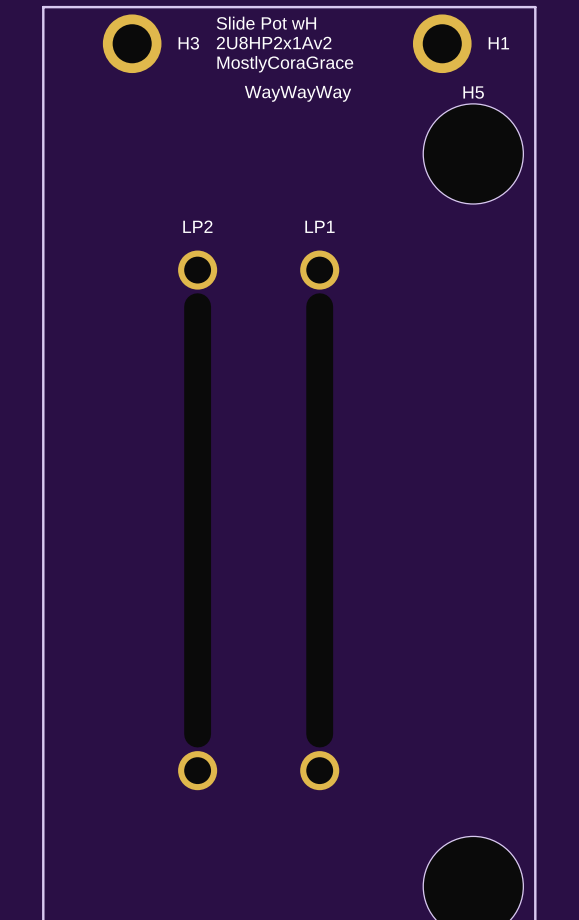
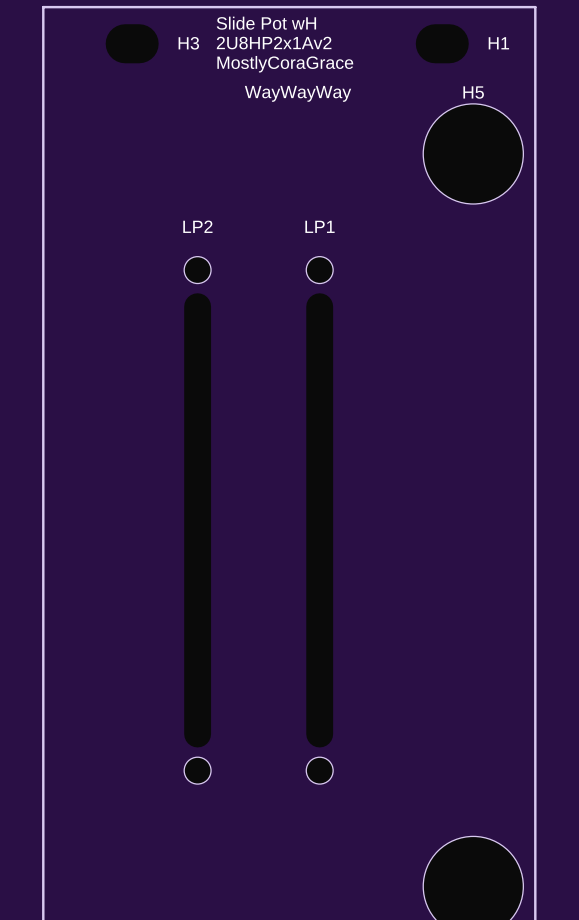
H3 footprint: [102, 14, 162, 74] -> [105, 24, 159, 64]
H1 footprint: [412, 14, 472, 74] -> [415, 24, 469, 64]
LP2 footprint: [178, 250, 218, 791] -> [184, 256, 212, 785]
LP1 footprint: [300, 250, 340, 791] -> [306, 256, 334, 785]

